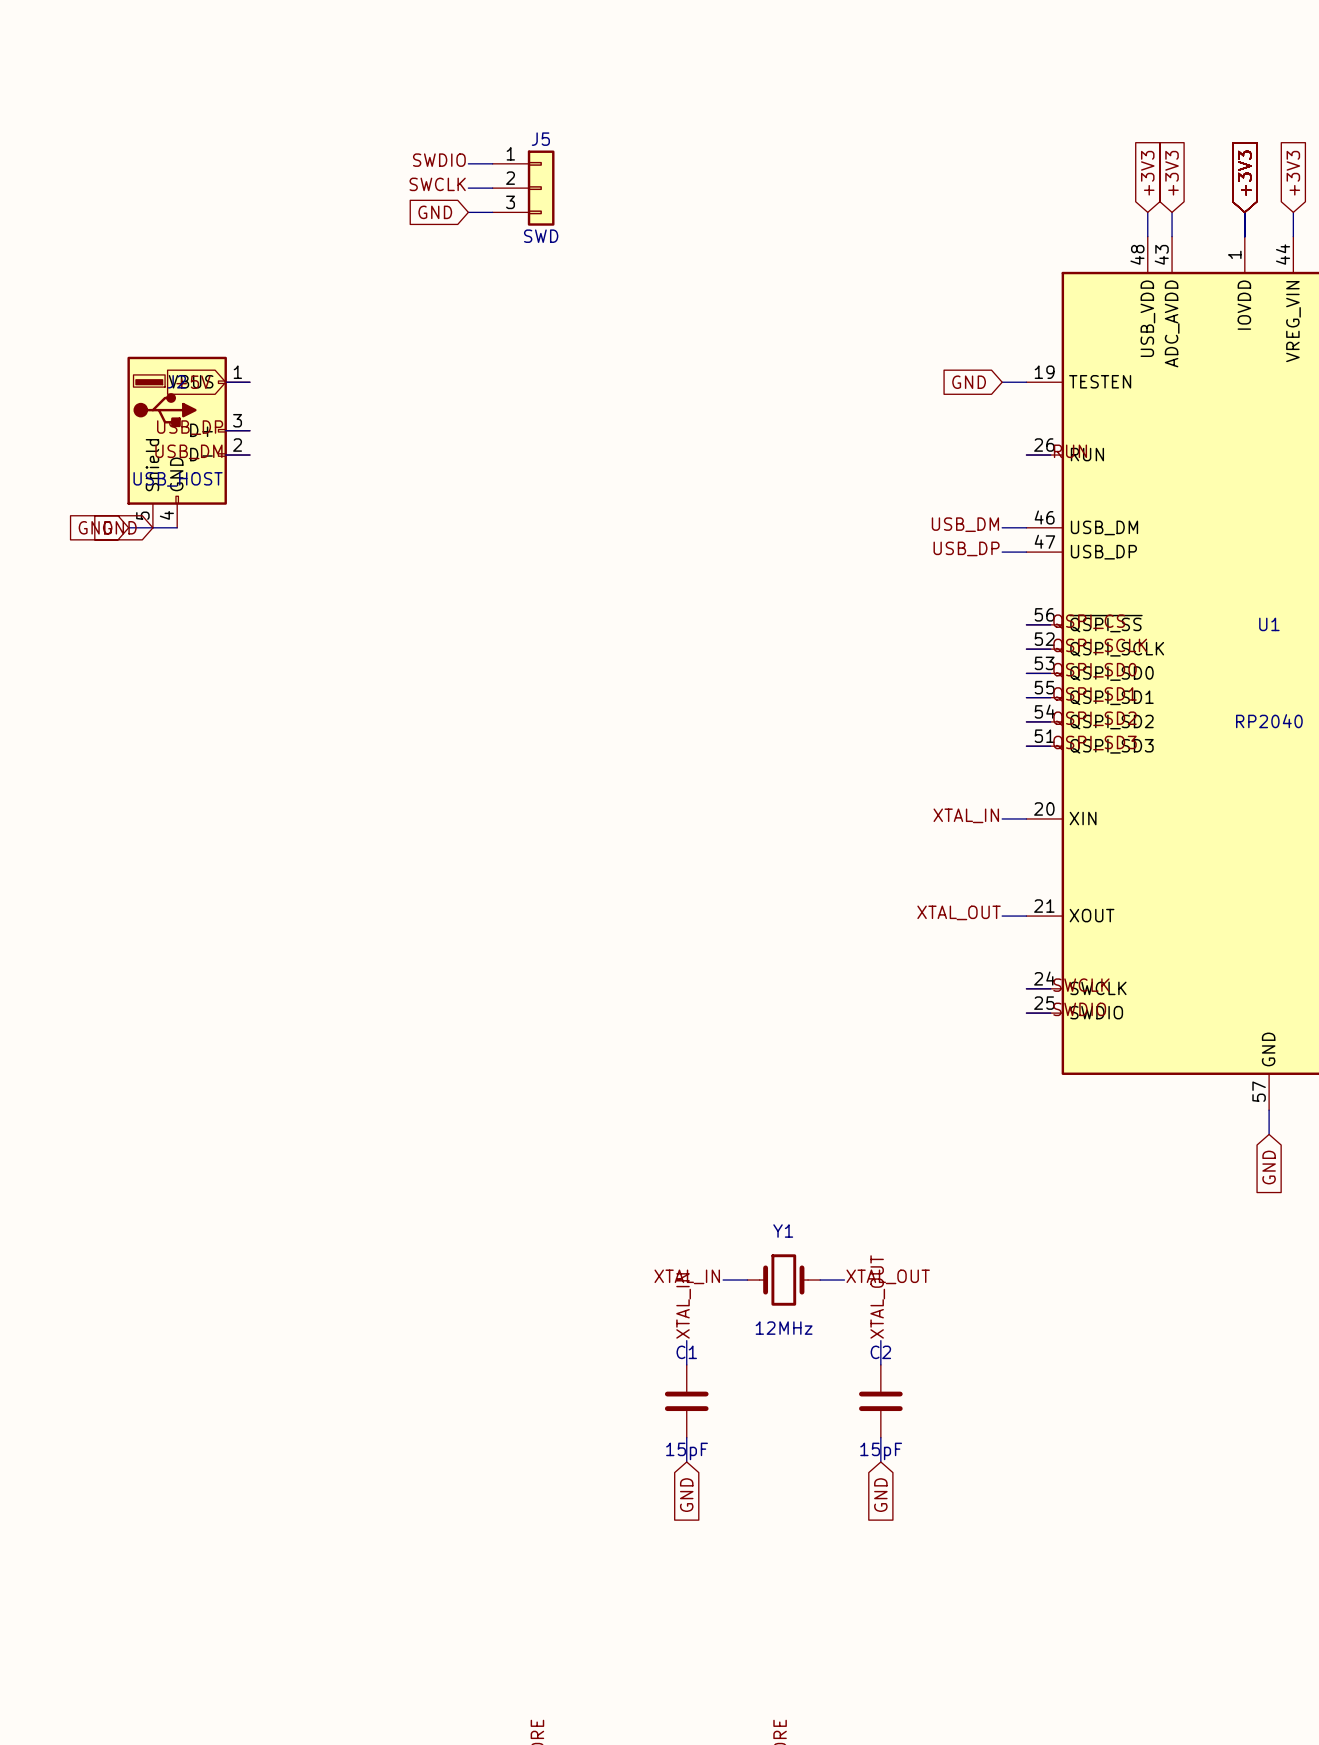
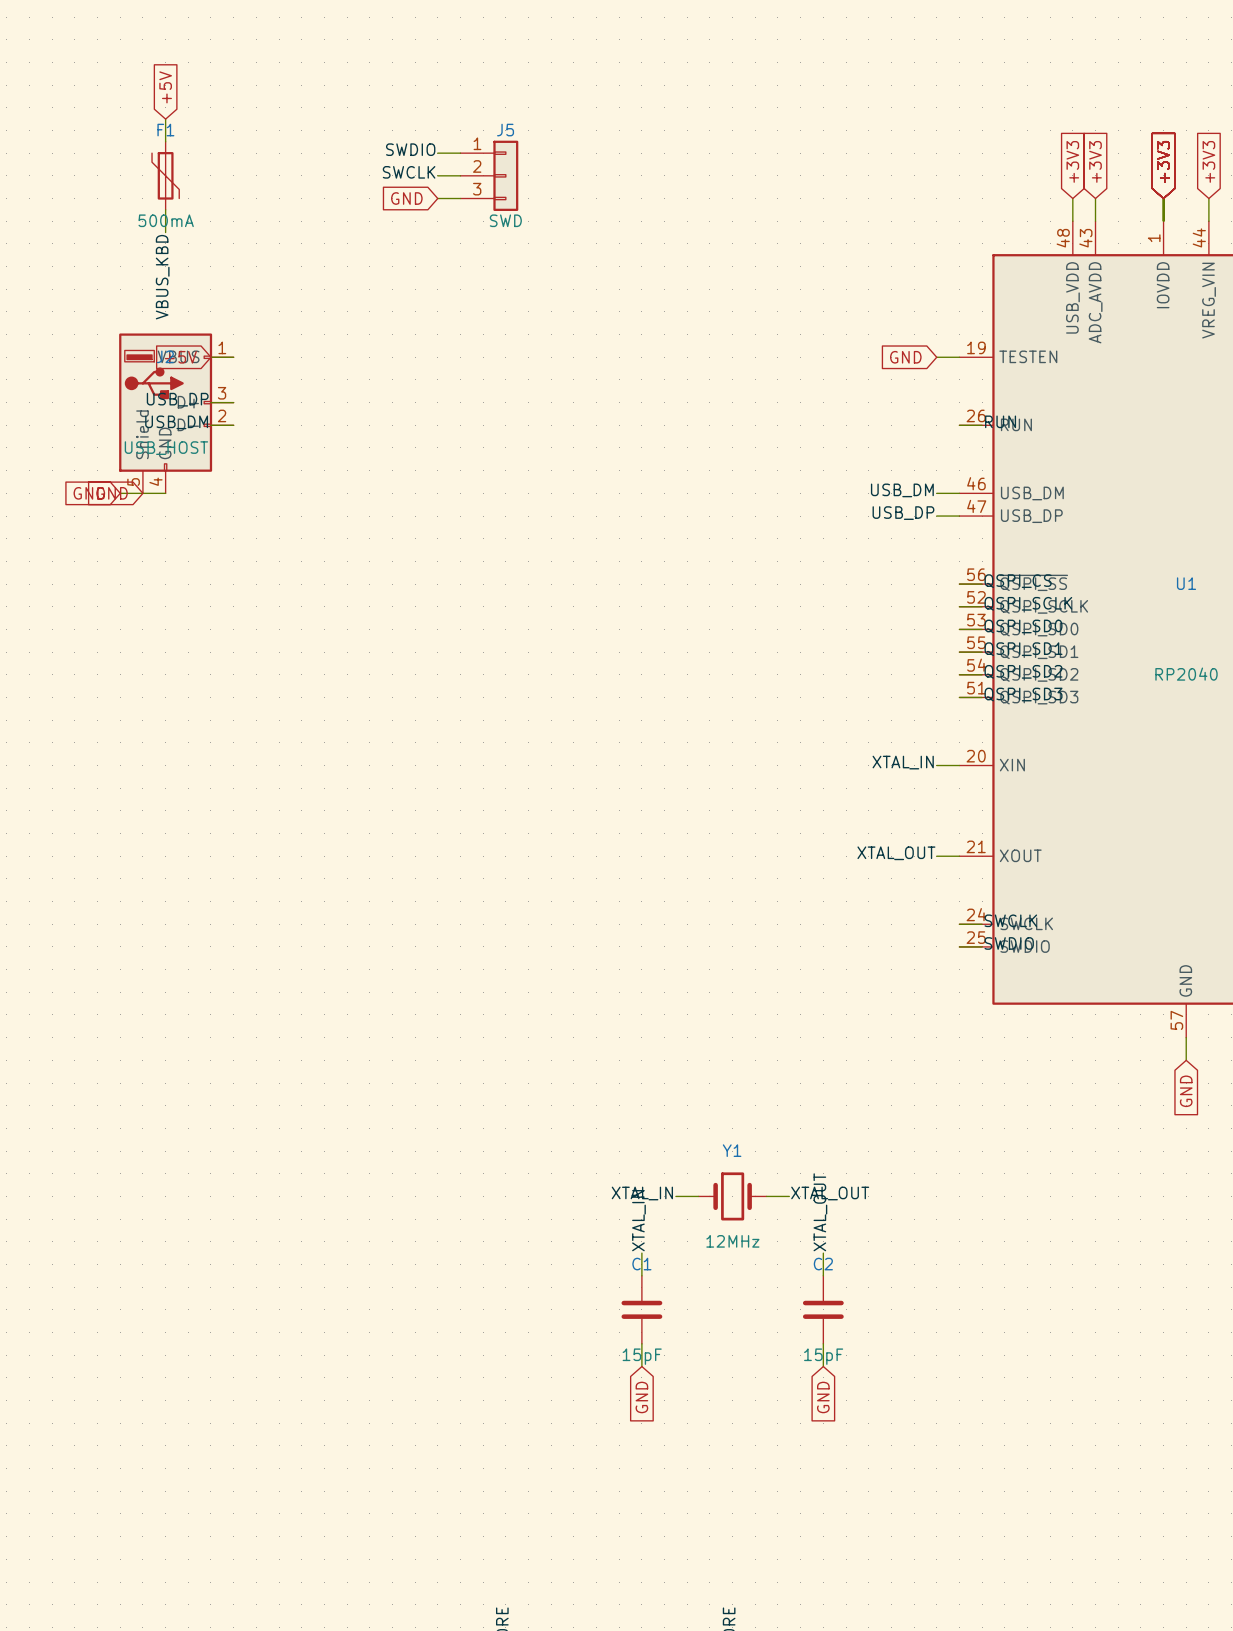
global label: none -> +5V (165, 87)
wire: none -> (165, 119) (165, 141)
F1: none -> 500mA (165, 175)
wire: none -> (165, 209) (165, 232)
label: none -> VBUS_KBD (162, 277)

